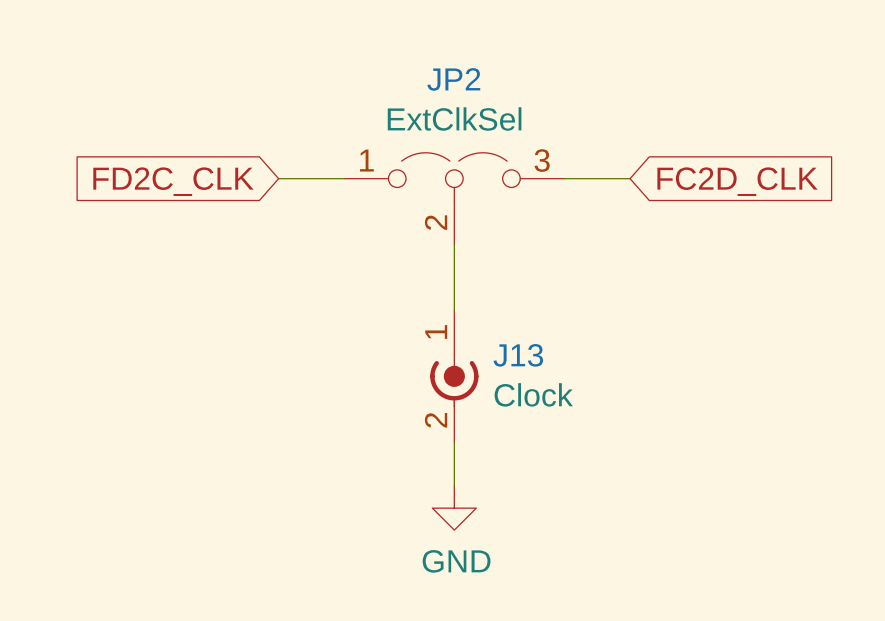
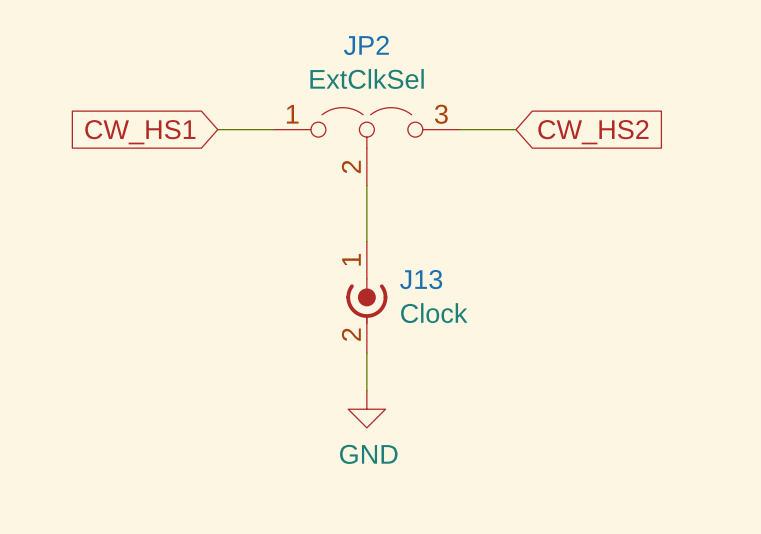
global label: FD2C_CLK (173, 181) -> CW_HS1 (140, 132)
global label: FC2D_CLK (737, 181) -> CW_HS2 (593, 132)

